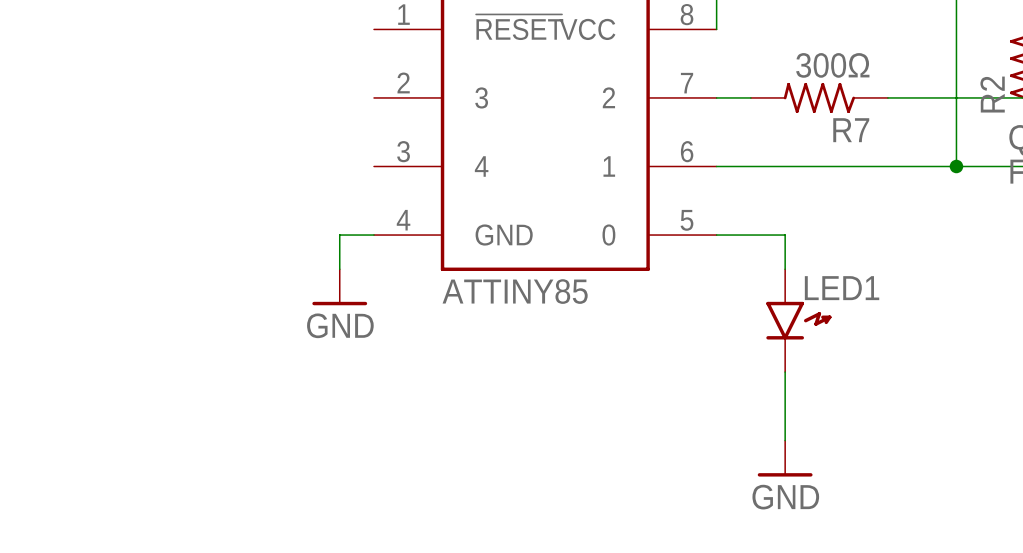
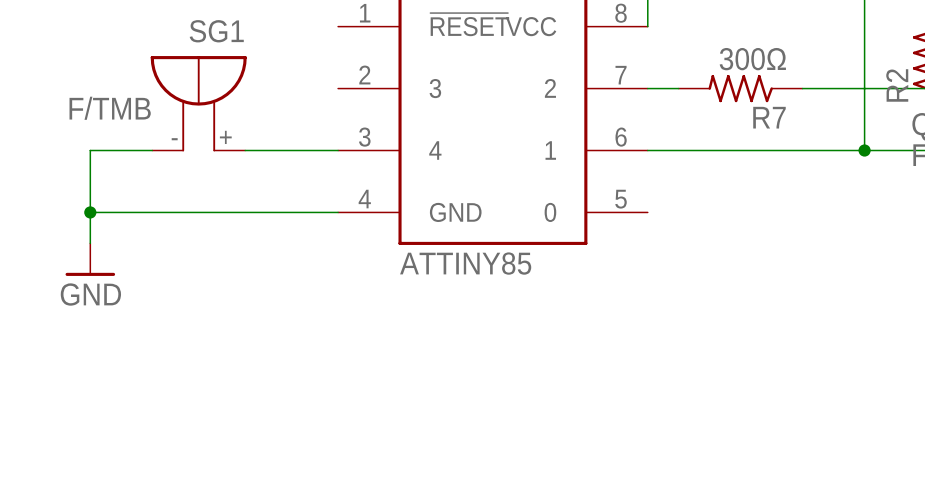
SG1: none -> F/TMB (198, 103)
wire: none -> (152, 150) (90, 150) (90, 243)
wire: none -> (245, 150) (338, 150)
junction: none -> (90, 212)
wire: (339, 235) (339, 269) -> (307, 212) (90, 212)
wire: (716, 235) (785, 235) (785, 269) -> none
power symbol position: GND (339, 287) -> GND (90, 259)
LED1: (798, 320) -> none
wire: (785, 372) (785, 440) -> none
power symbol: GND (785, 458) -> none

